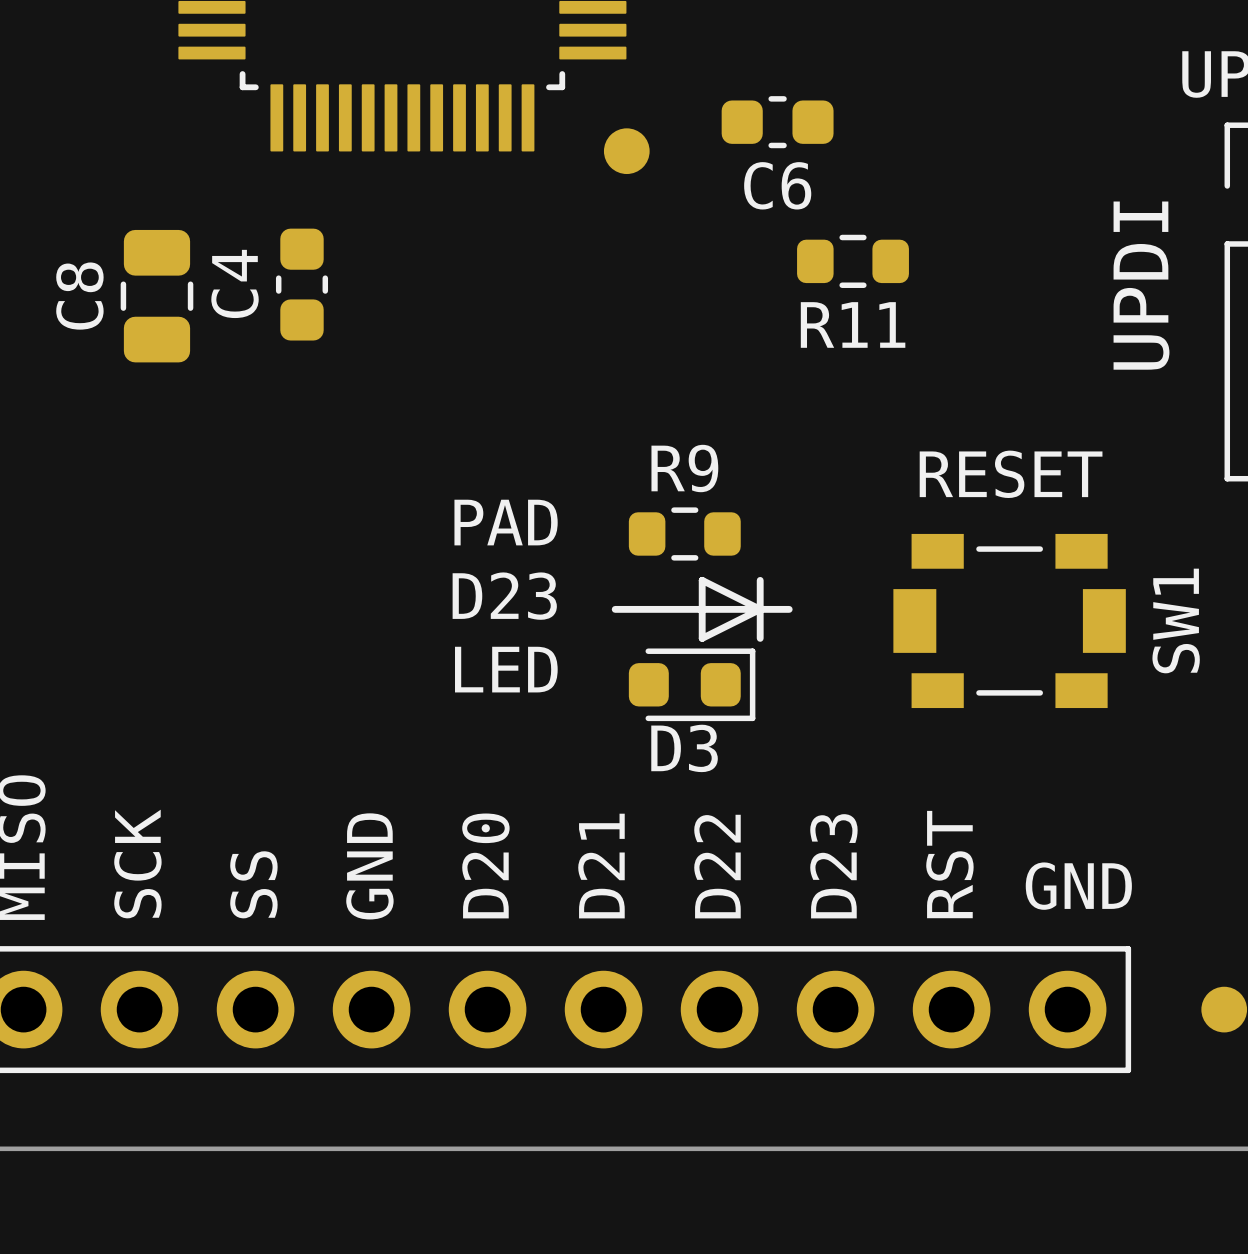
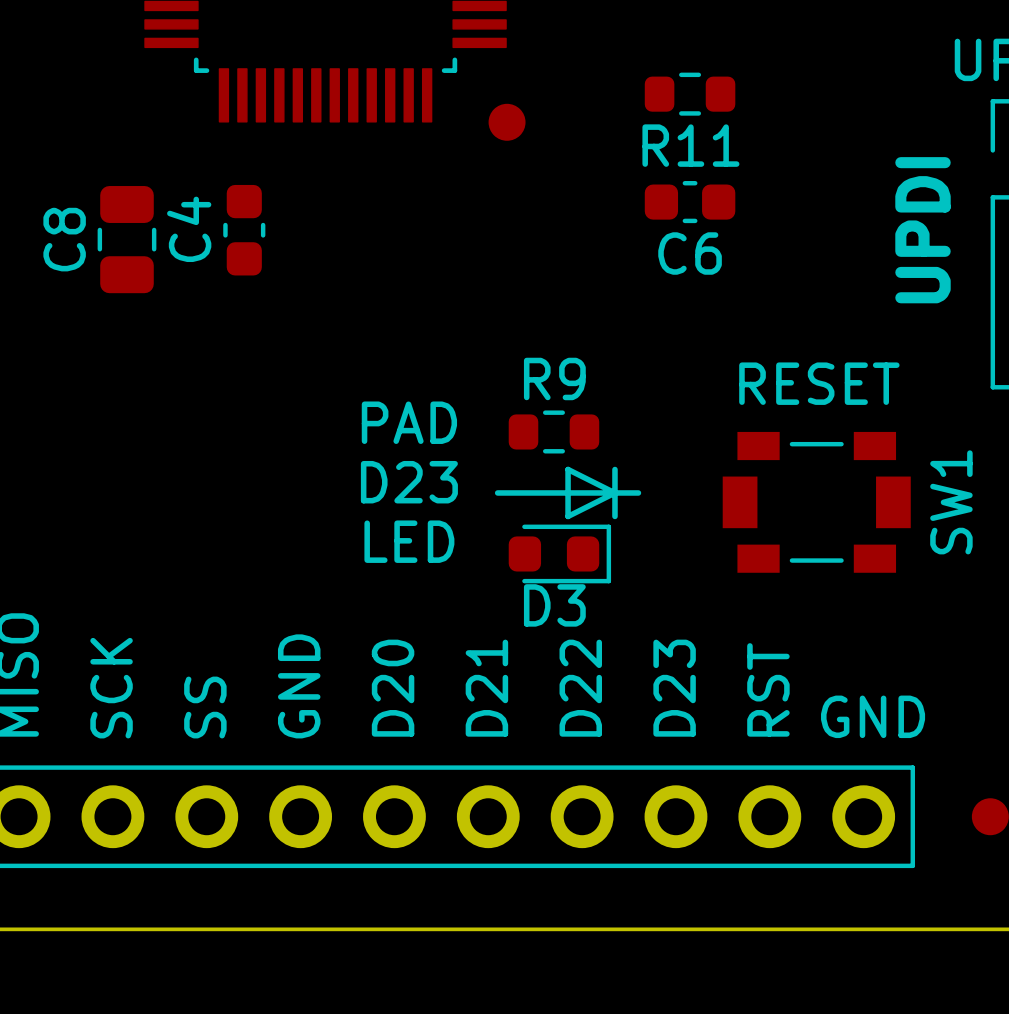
C6 position: (777, 122) -> (690, 202)
R11 position: (853, 261) -> (690, 94)

